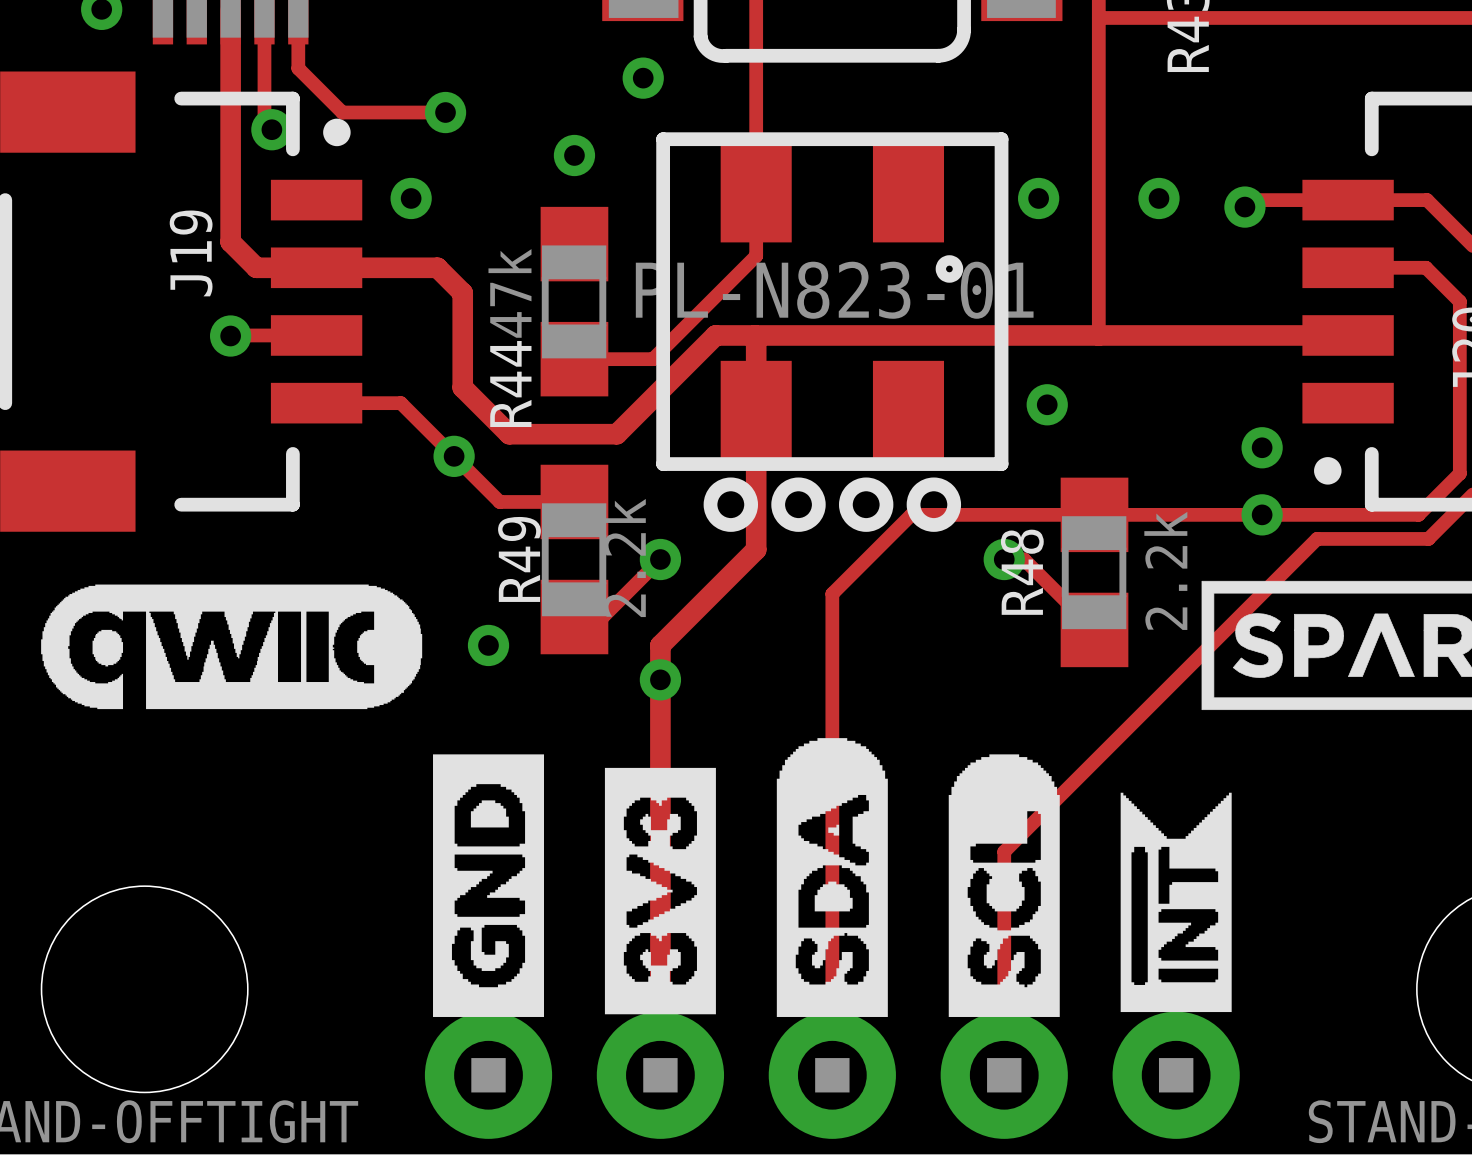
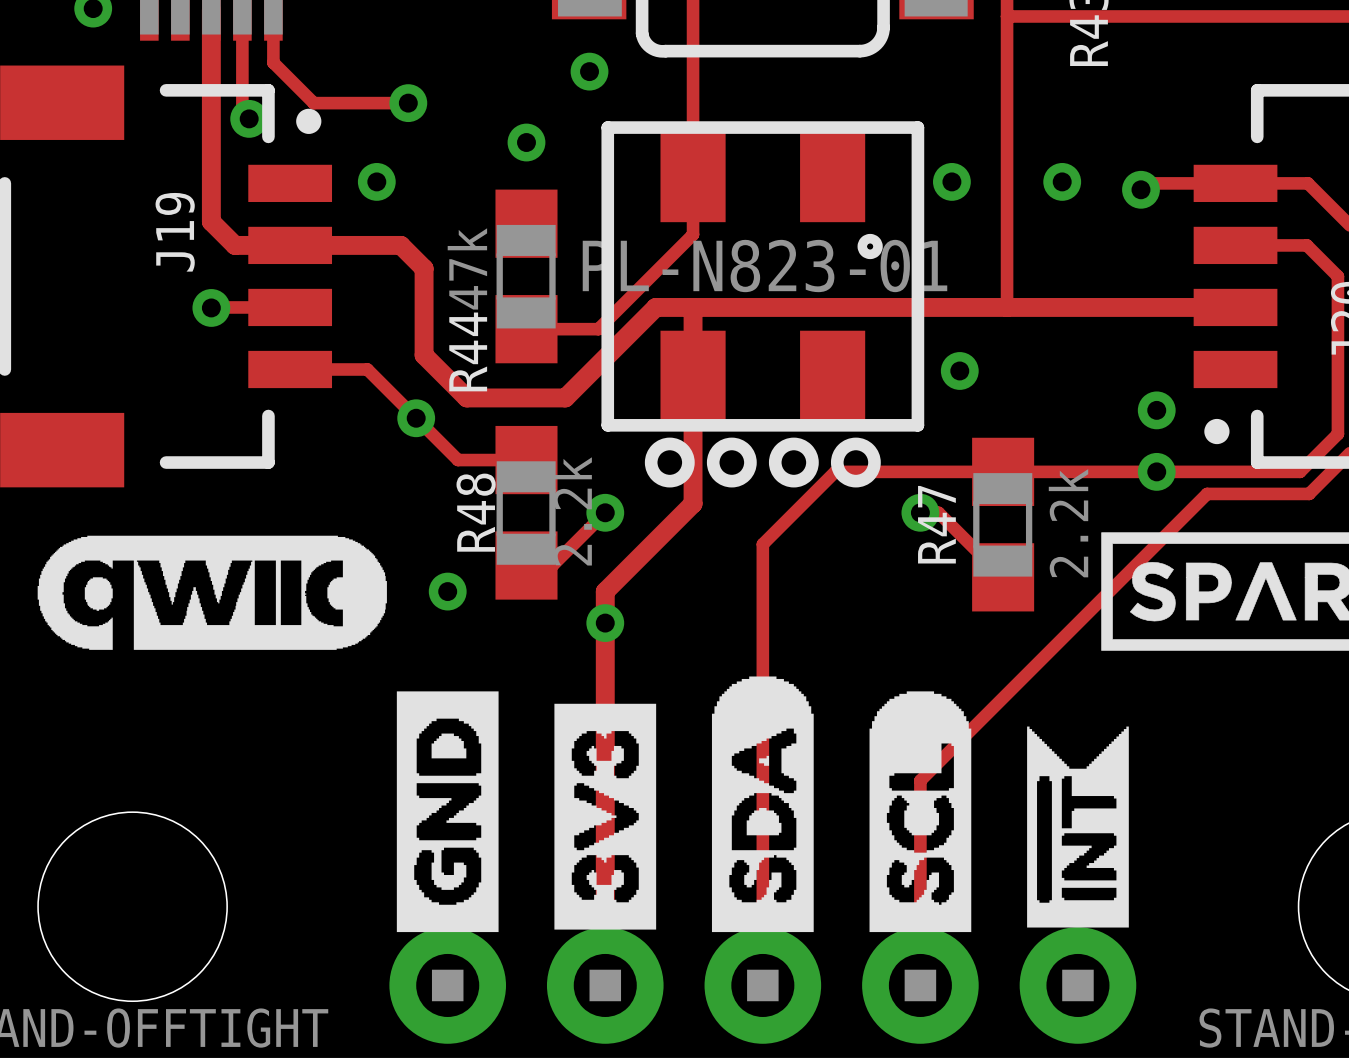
R49 name: R49 (519, 559) -> R48 (476, 512)
R48 name: R48 (1022, 572) -> R47 (936, 524)

